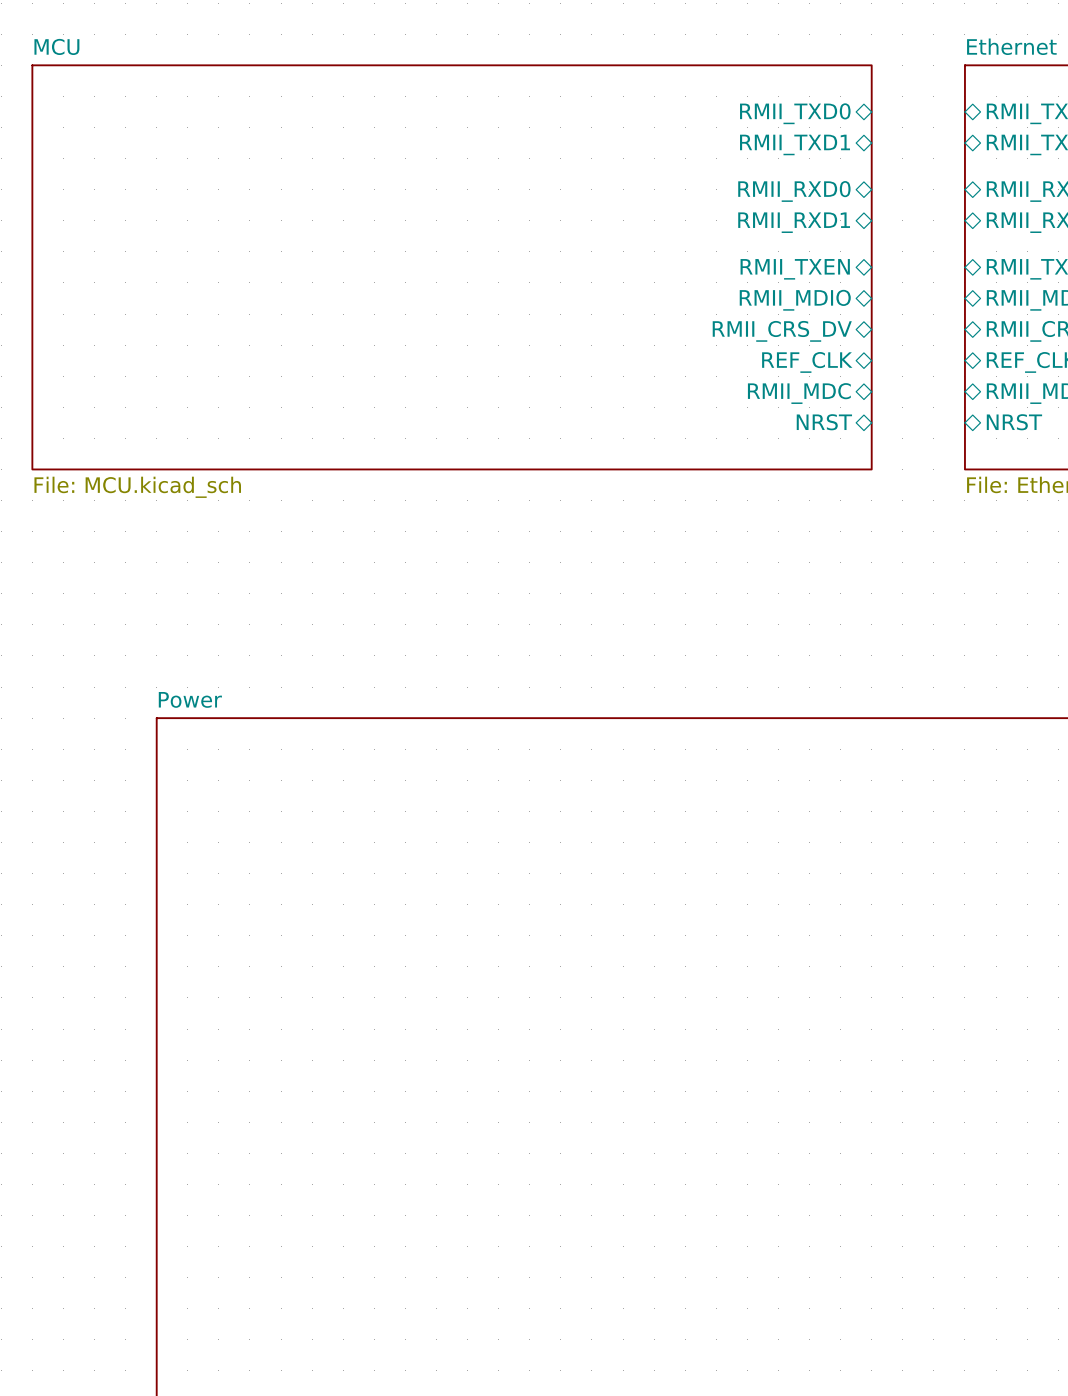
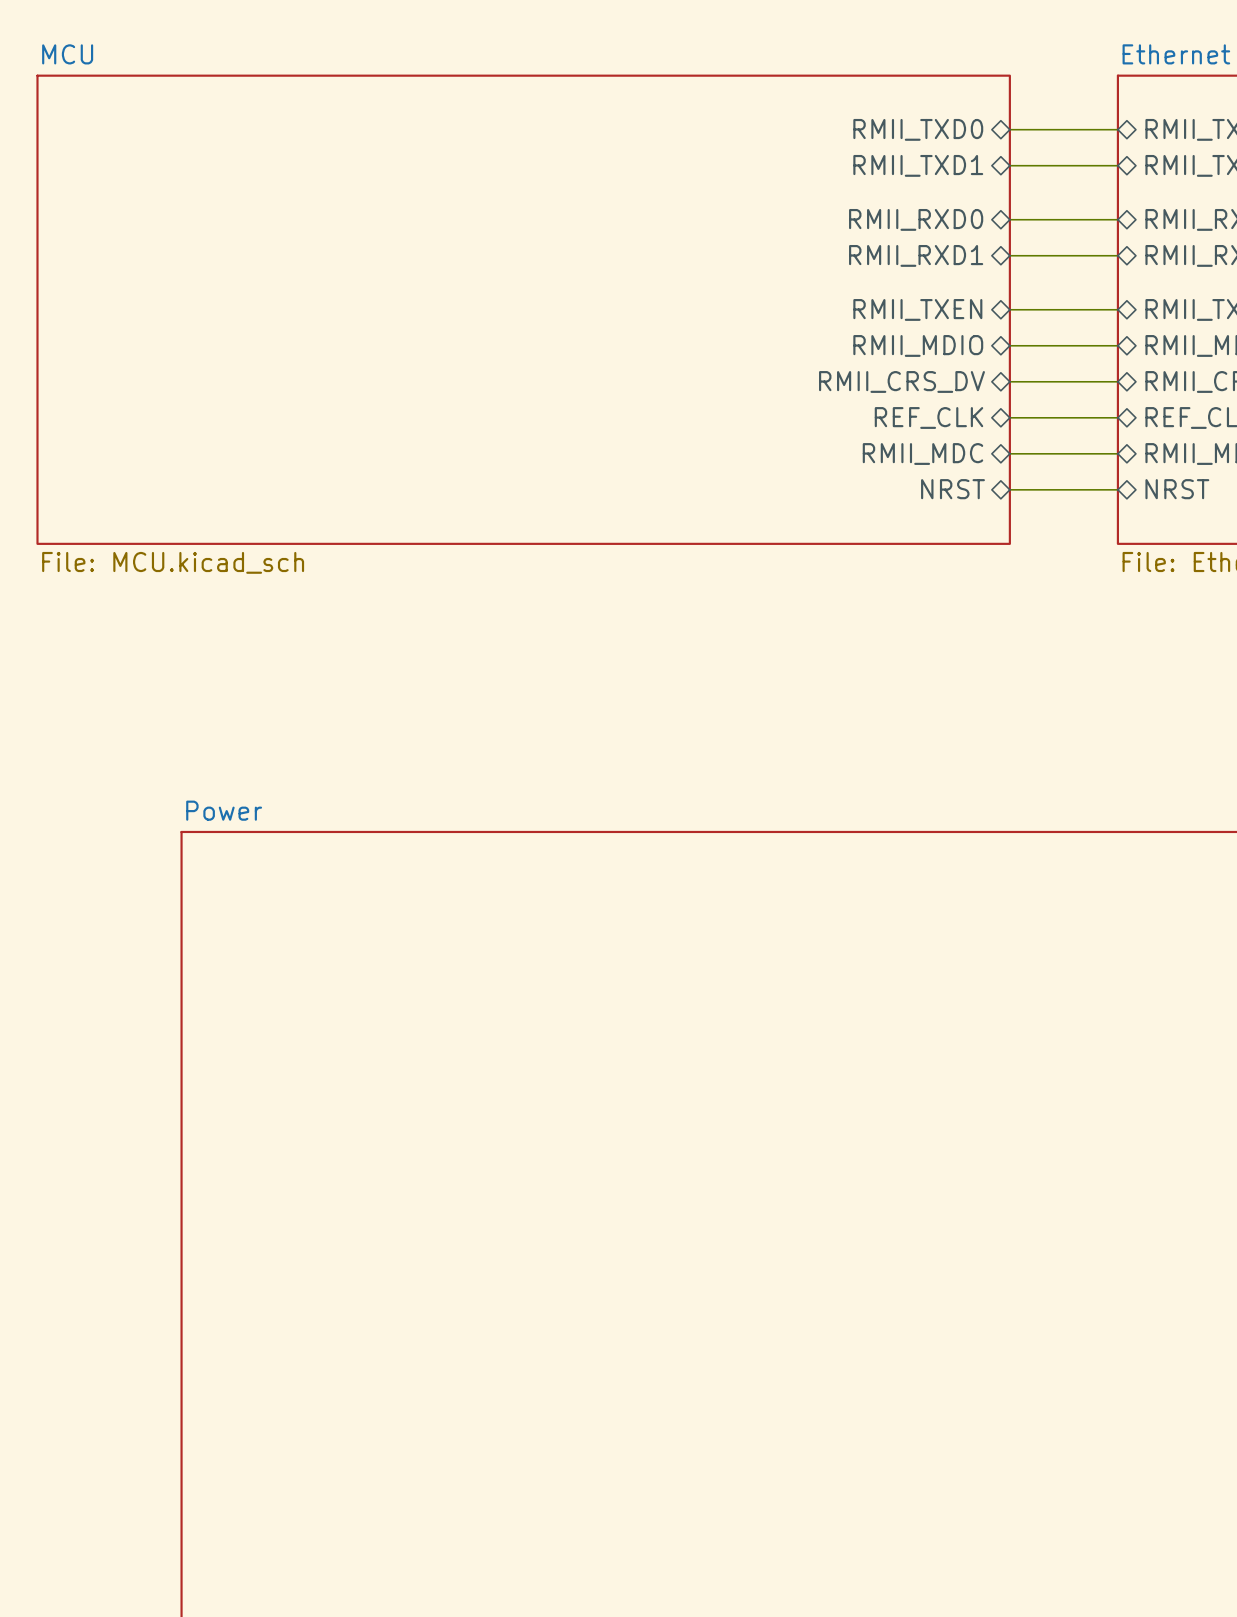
wire: none -> (1009, 129) (1117, 129)
wire: none -> (1009, 165) (1117, 165)
wire: none -> (1009, 219) (1117, 219)
wire: none -> (1009, 255) (1117, 255)
wire: none -> (1009, 309) (1117, 309)
wire: none -> (1009, 345) (1117, 345)
wire: none -> (1009, 381) (1117, 381)
wire: none -> (1009, 417) (1117, 417)
wire: none -> (1009, 453) (1117, 453)
wire: none -> (1009, 489) (1117, 489)

